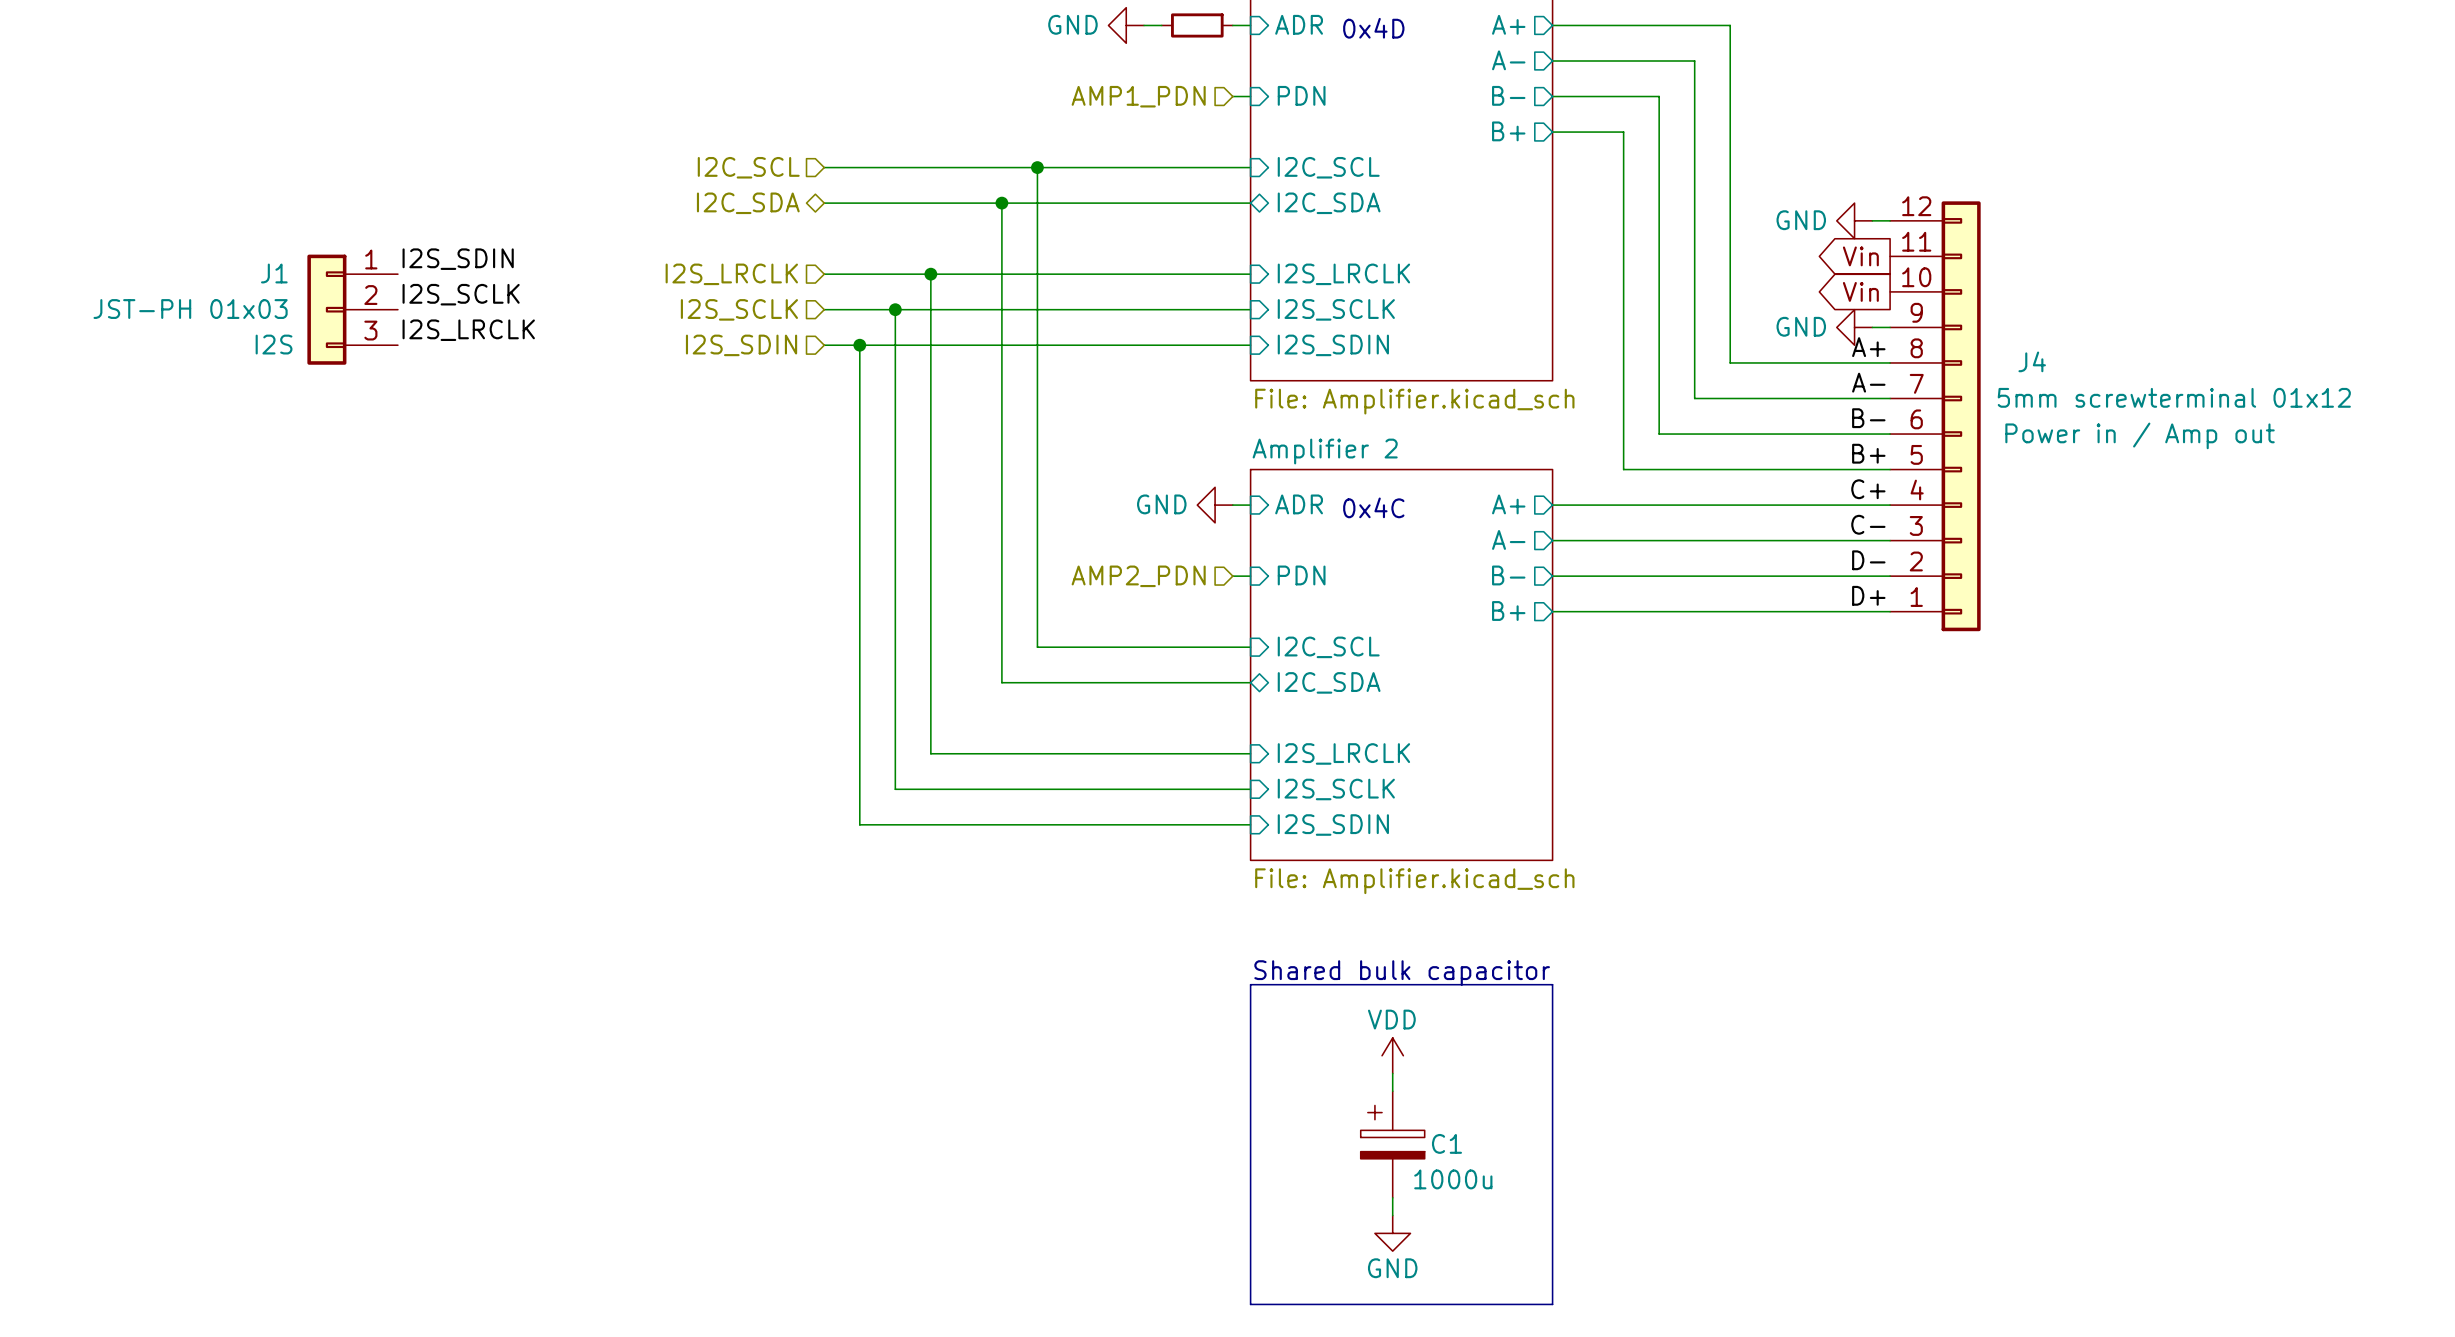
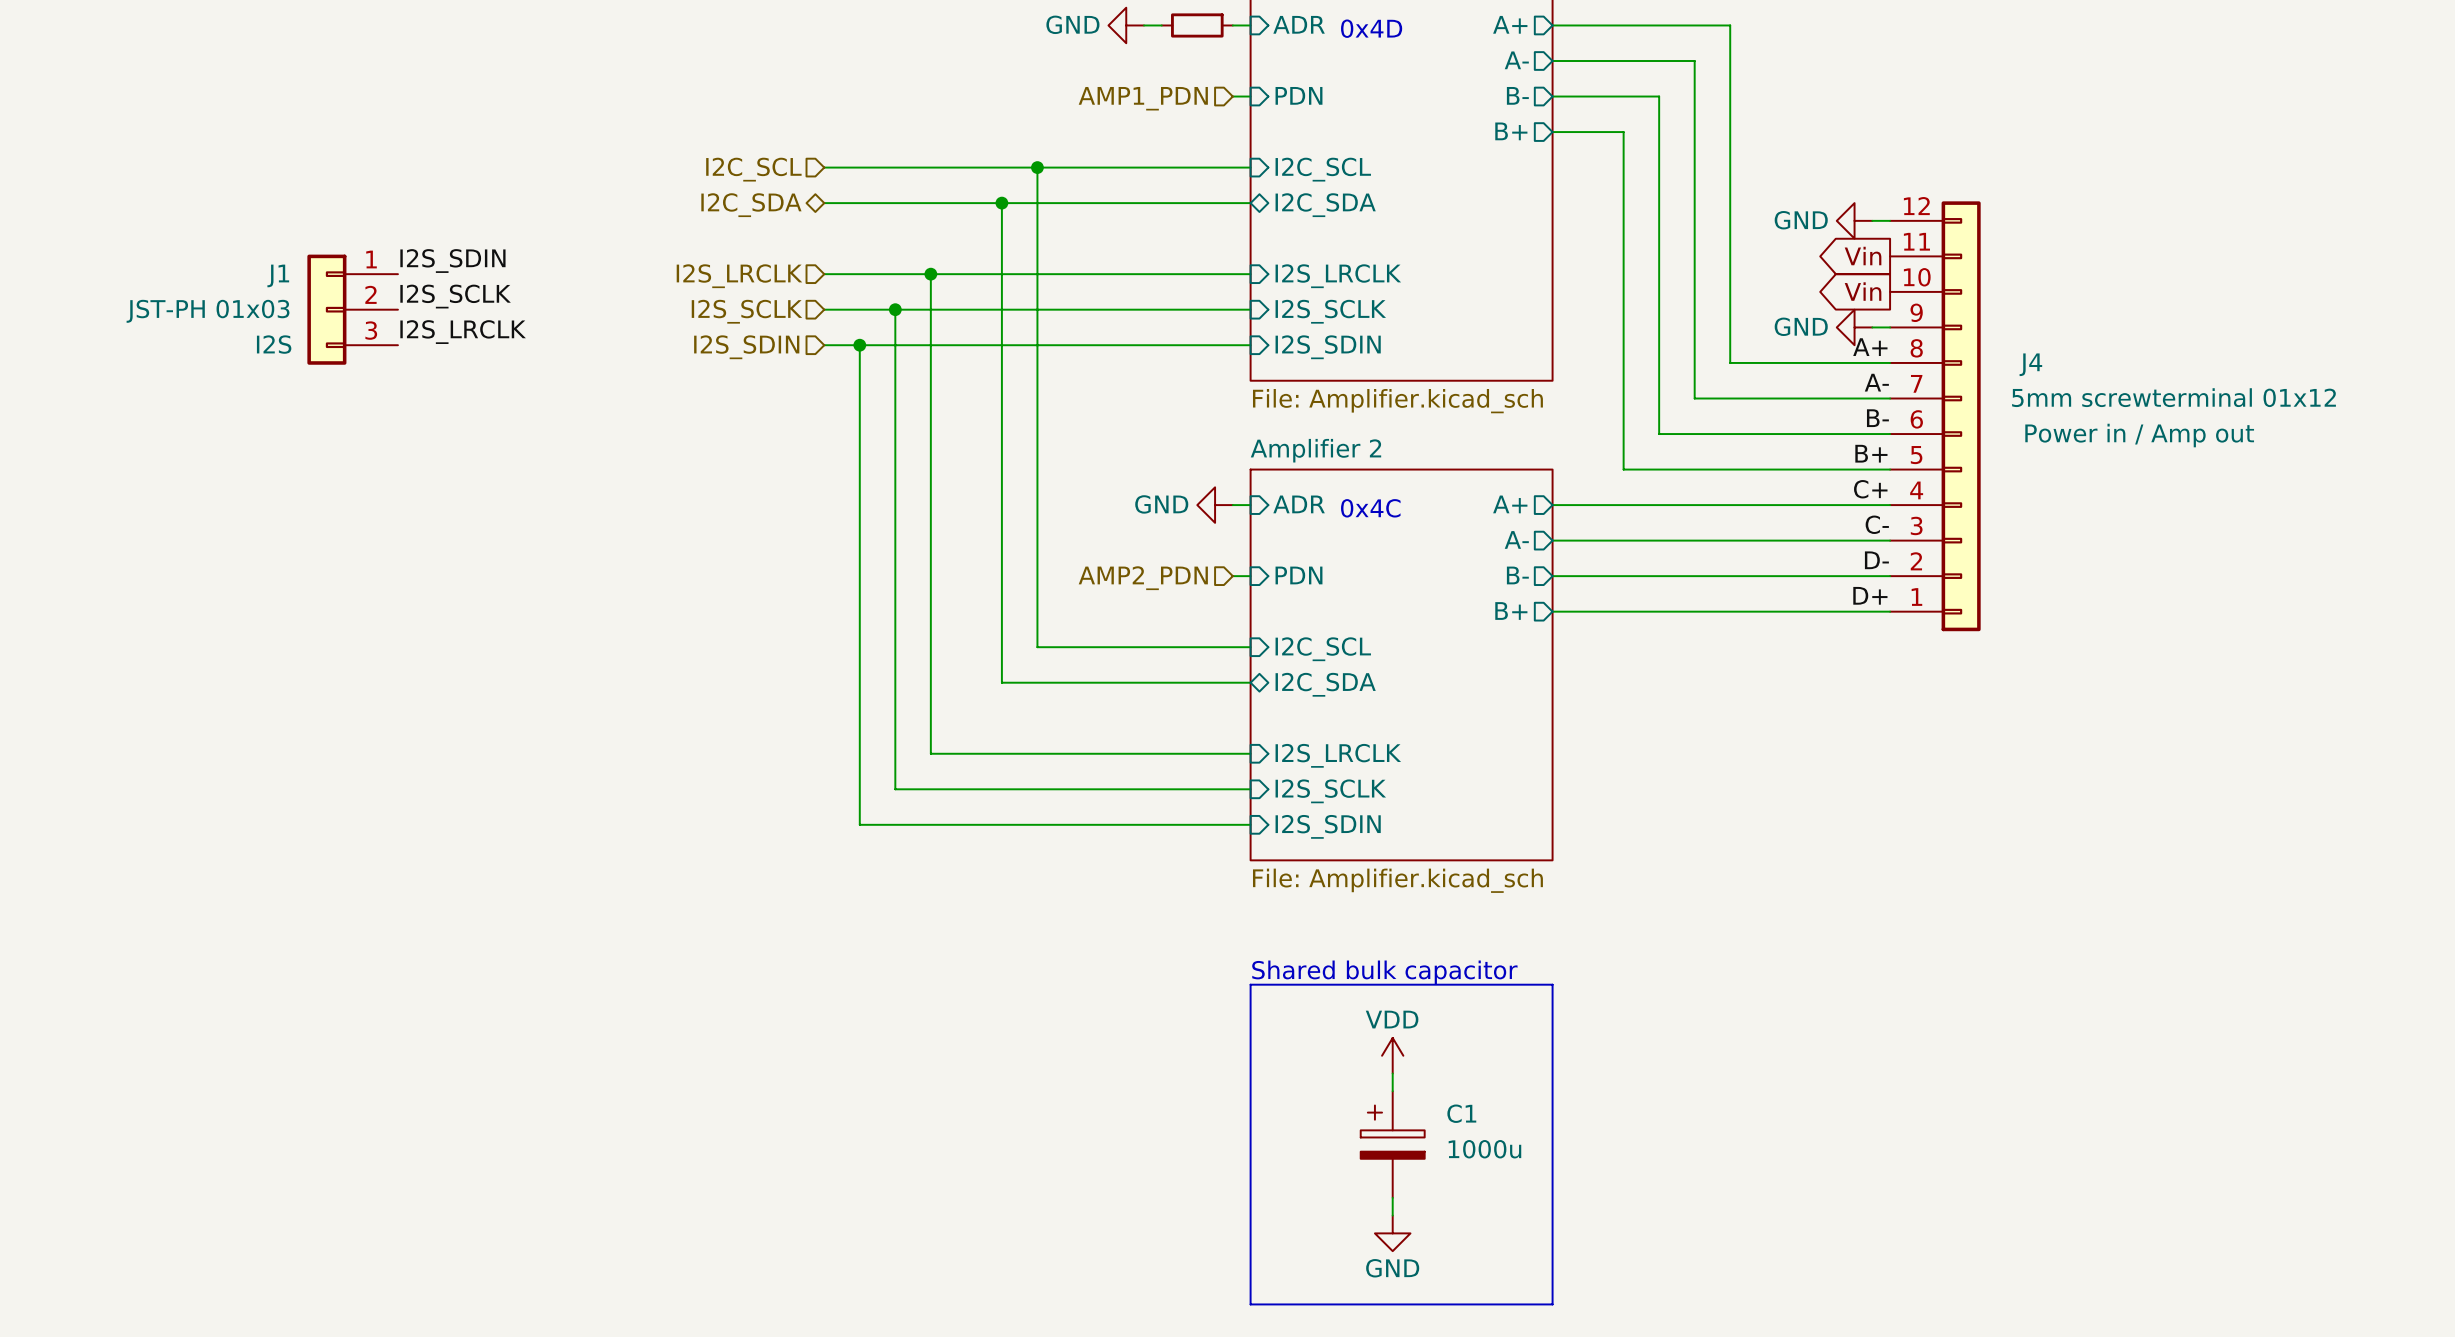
C1 name position: C1 (1446, 1143) -> C1 (1461, 1113)
C1 value position: 1000u (1453, 1179) -> 1000u (1484, 1149)

